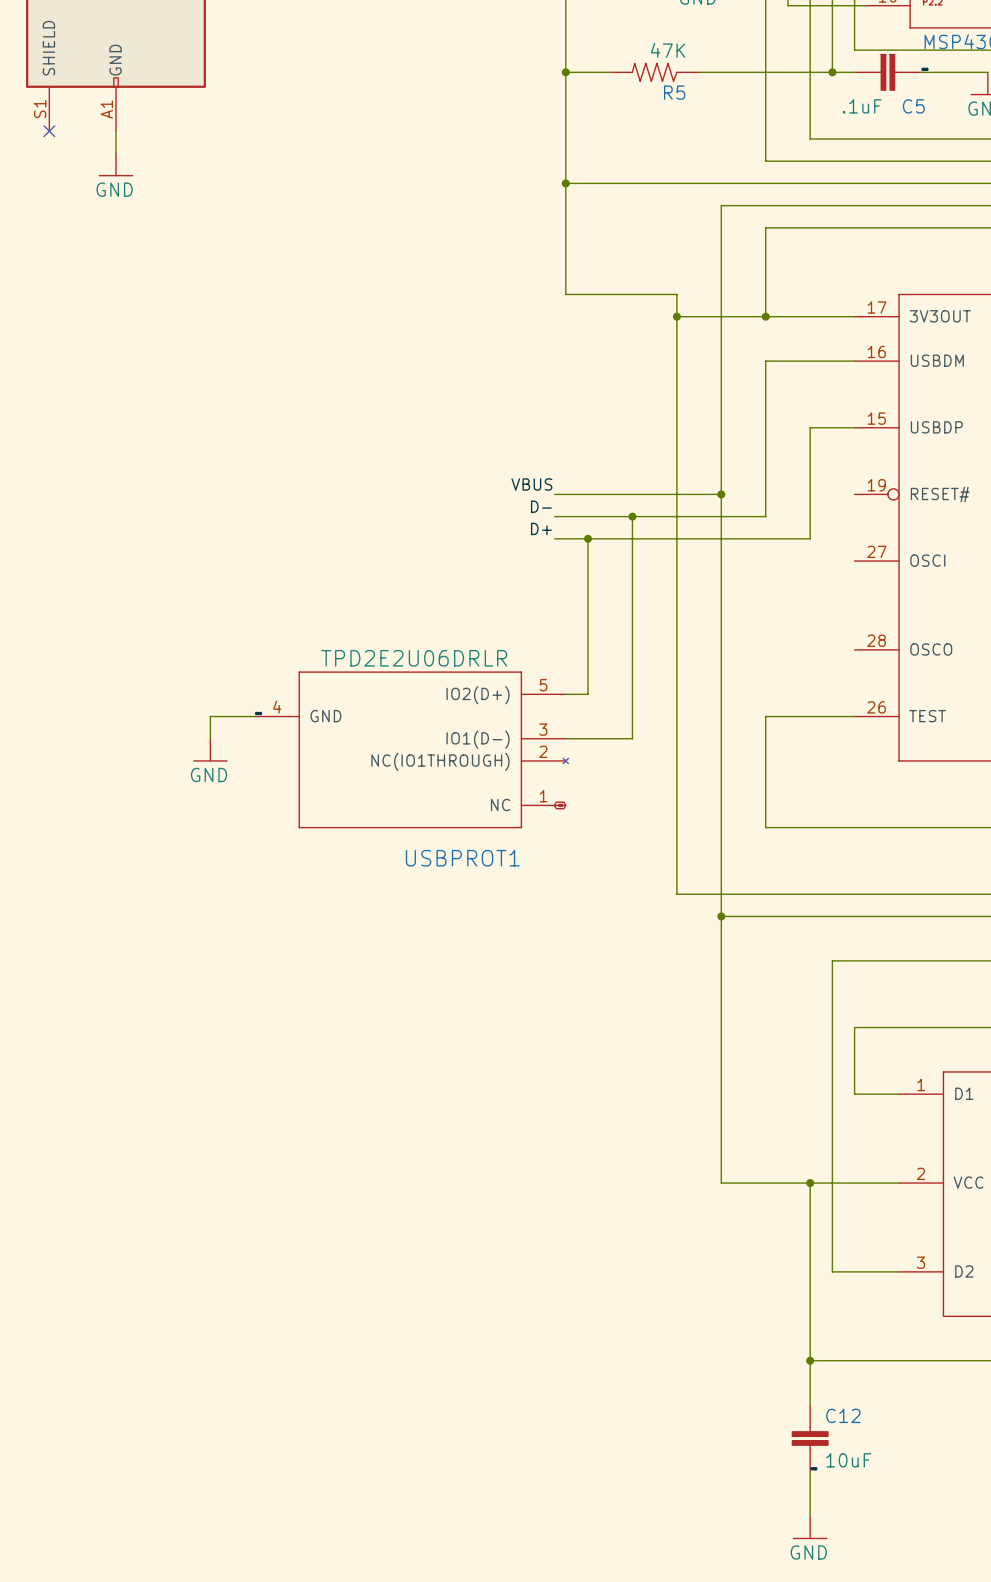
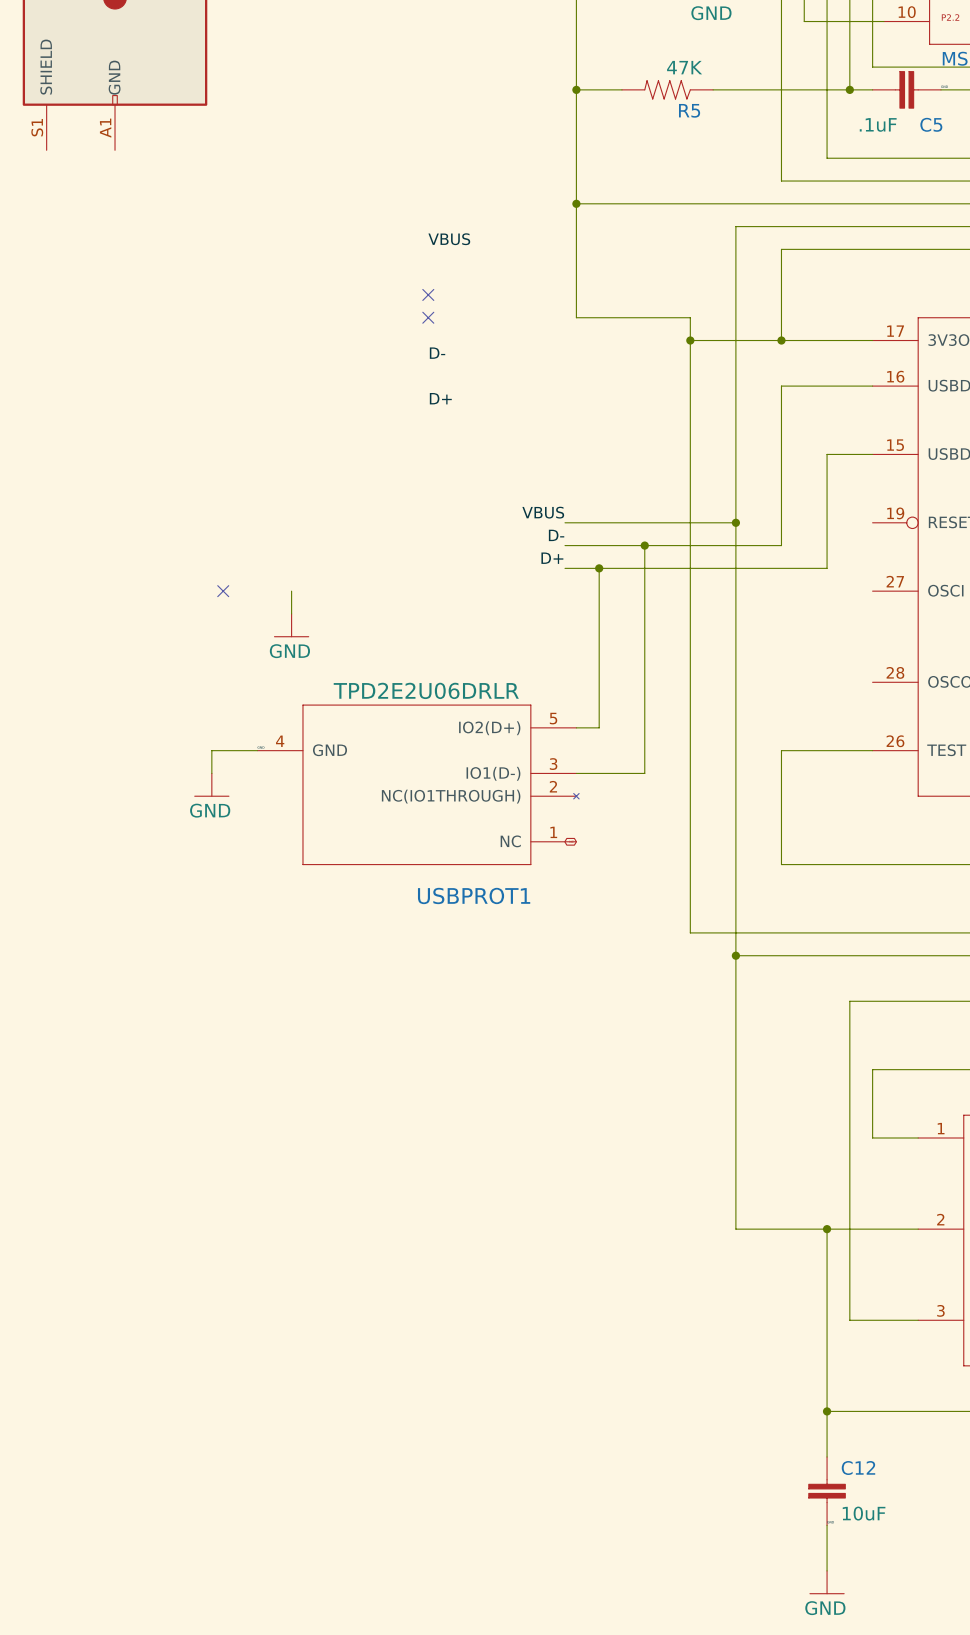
no-connect mark: (49, 131) -> none
wire: (115, 131) (115, 153) -> none
power symbol: GND (115, 164) -> none
label: none -> VBUS (449, 239)
no-connect mark: none -> (428, 294)
no-connect mark: none -> (428, 317)
label: none -> D- (437, 353)
label: none -> D+ (440, 398)
no-connect mark: none -> (223, 591)
wire: none -> (291, 591) (291, 613)
power symbol: none -> GND (291, 625)

